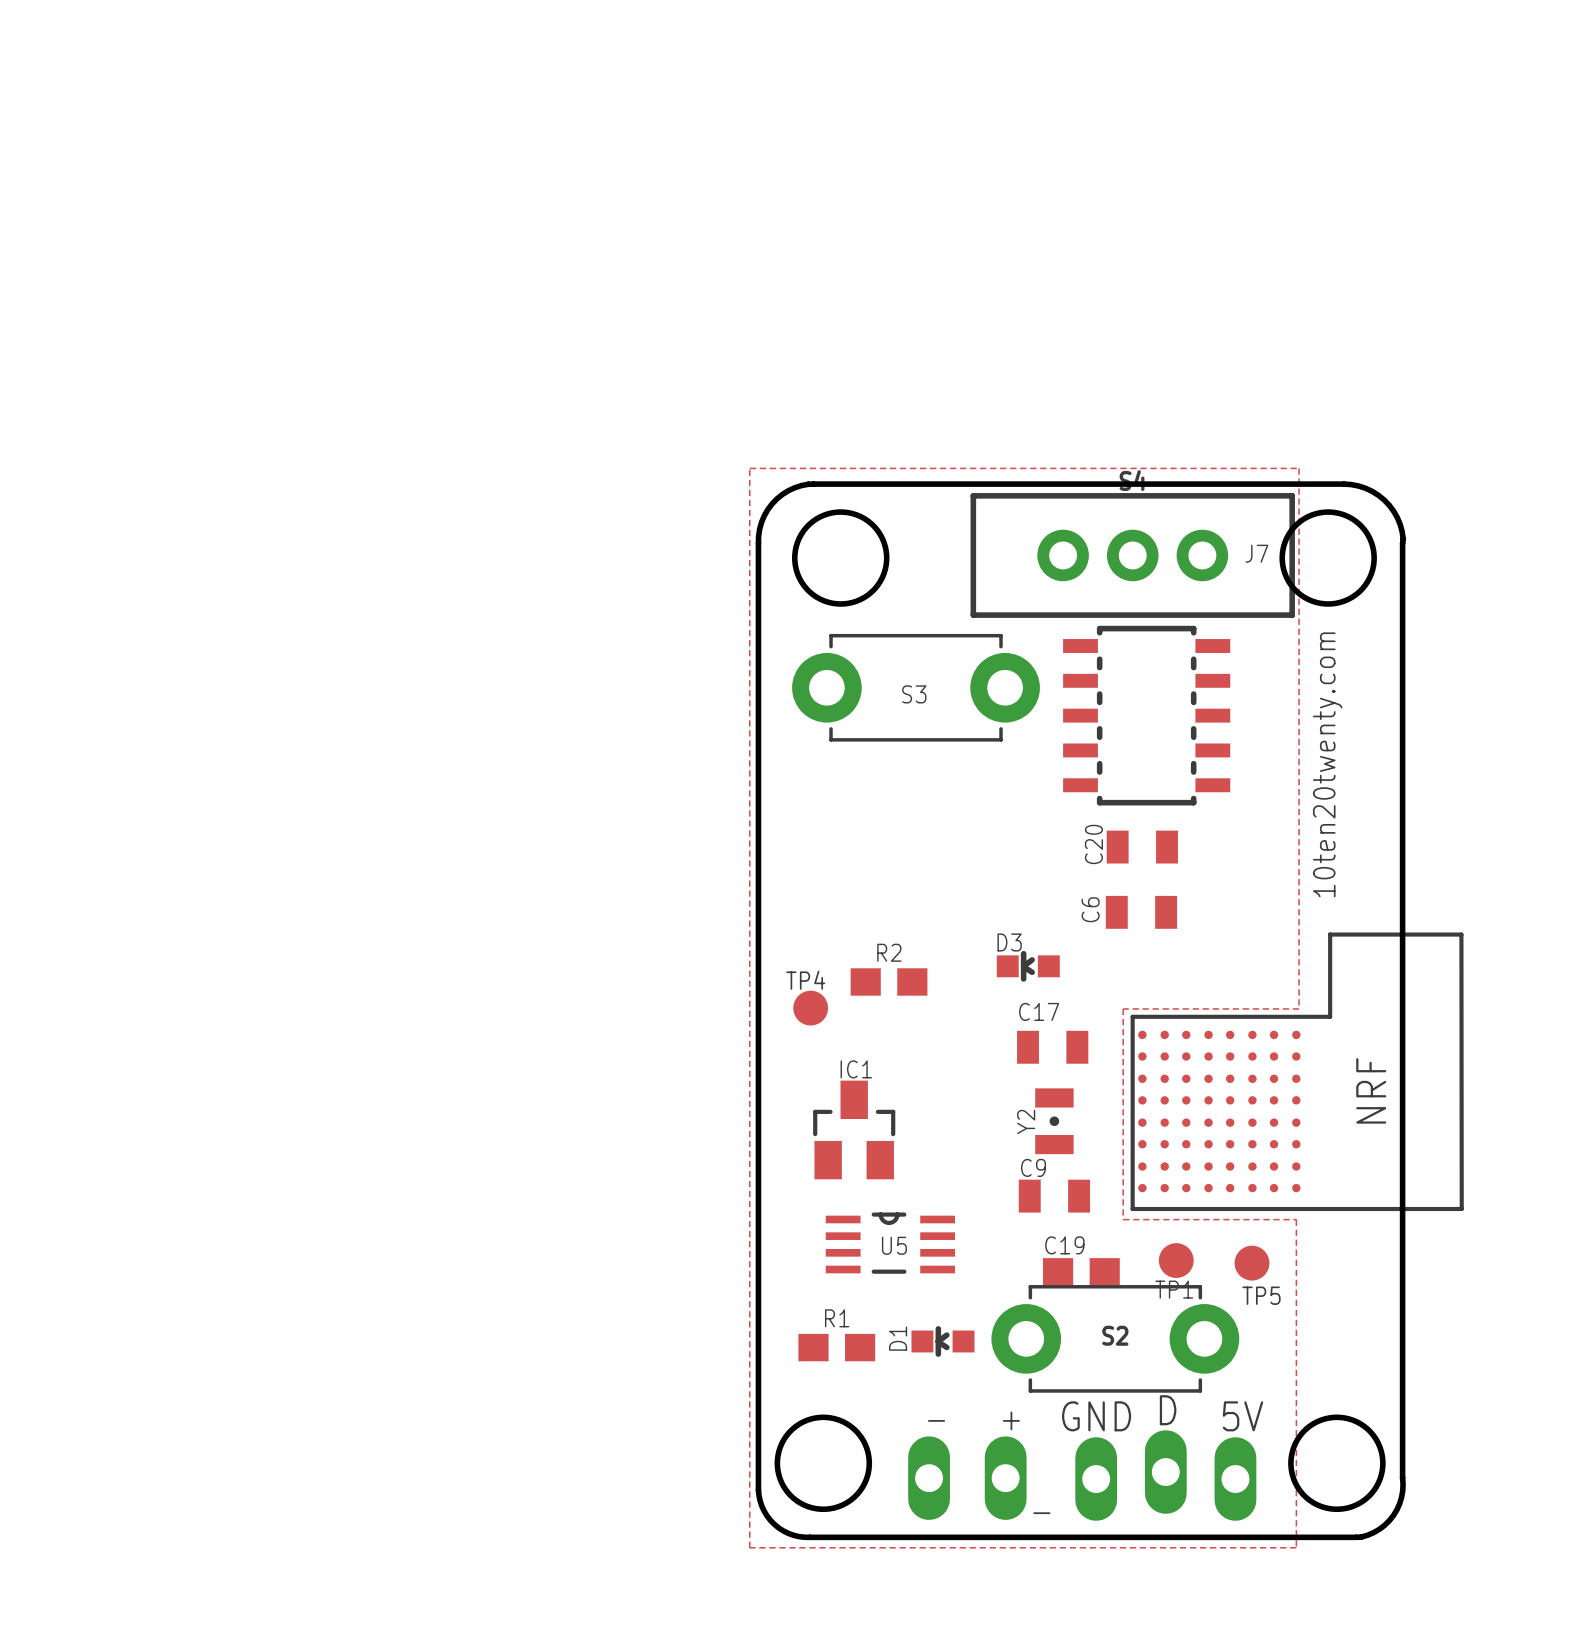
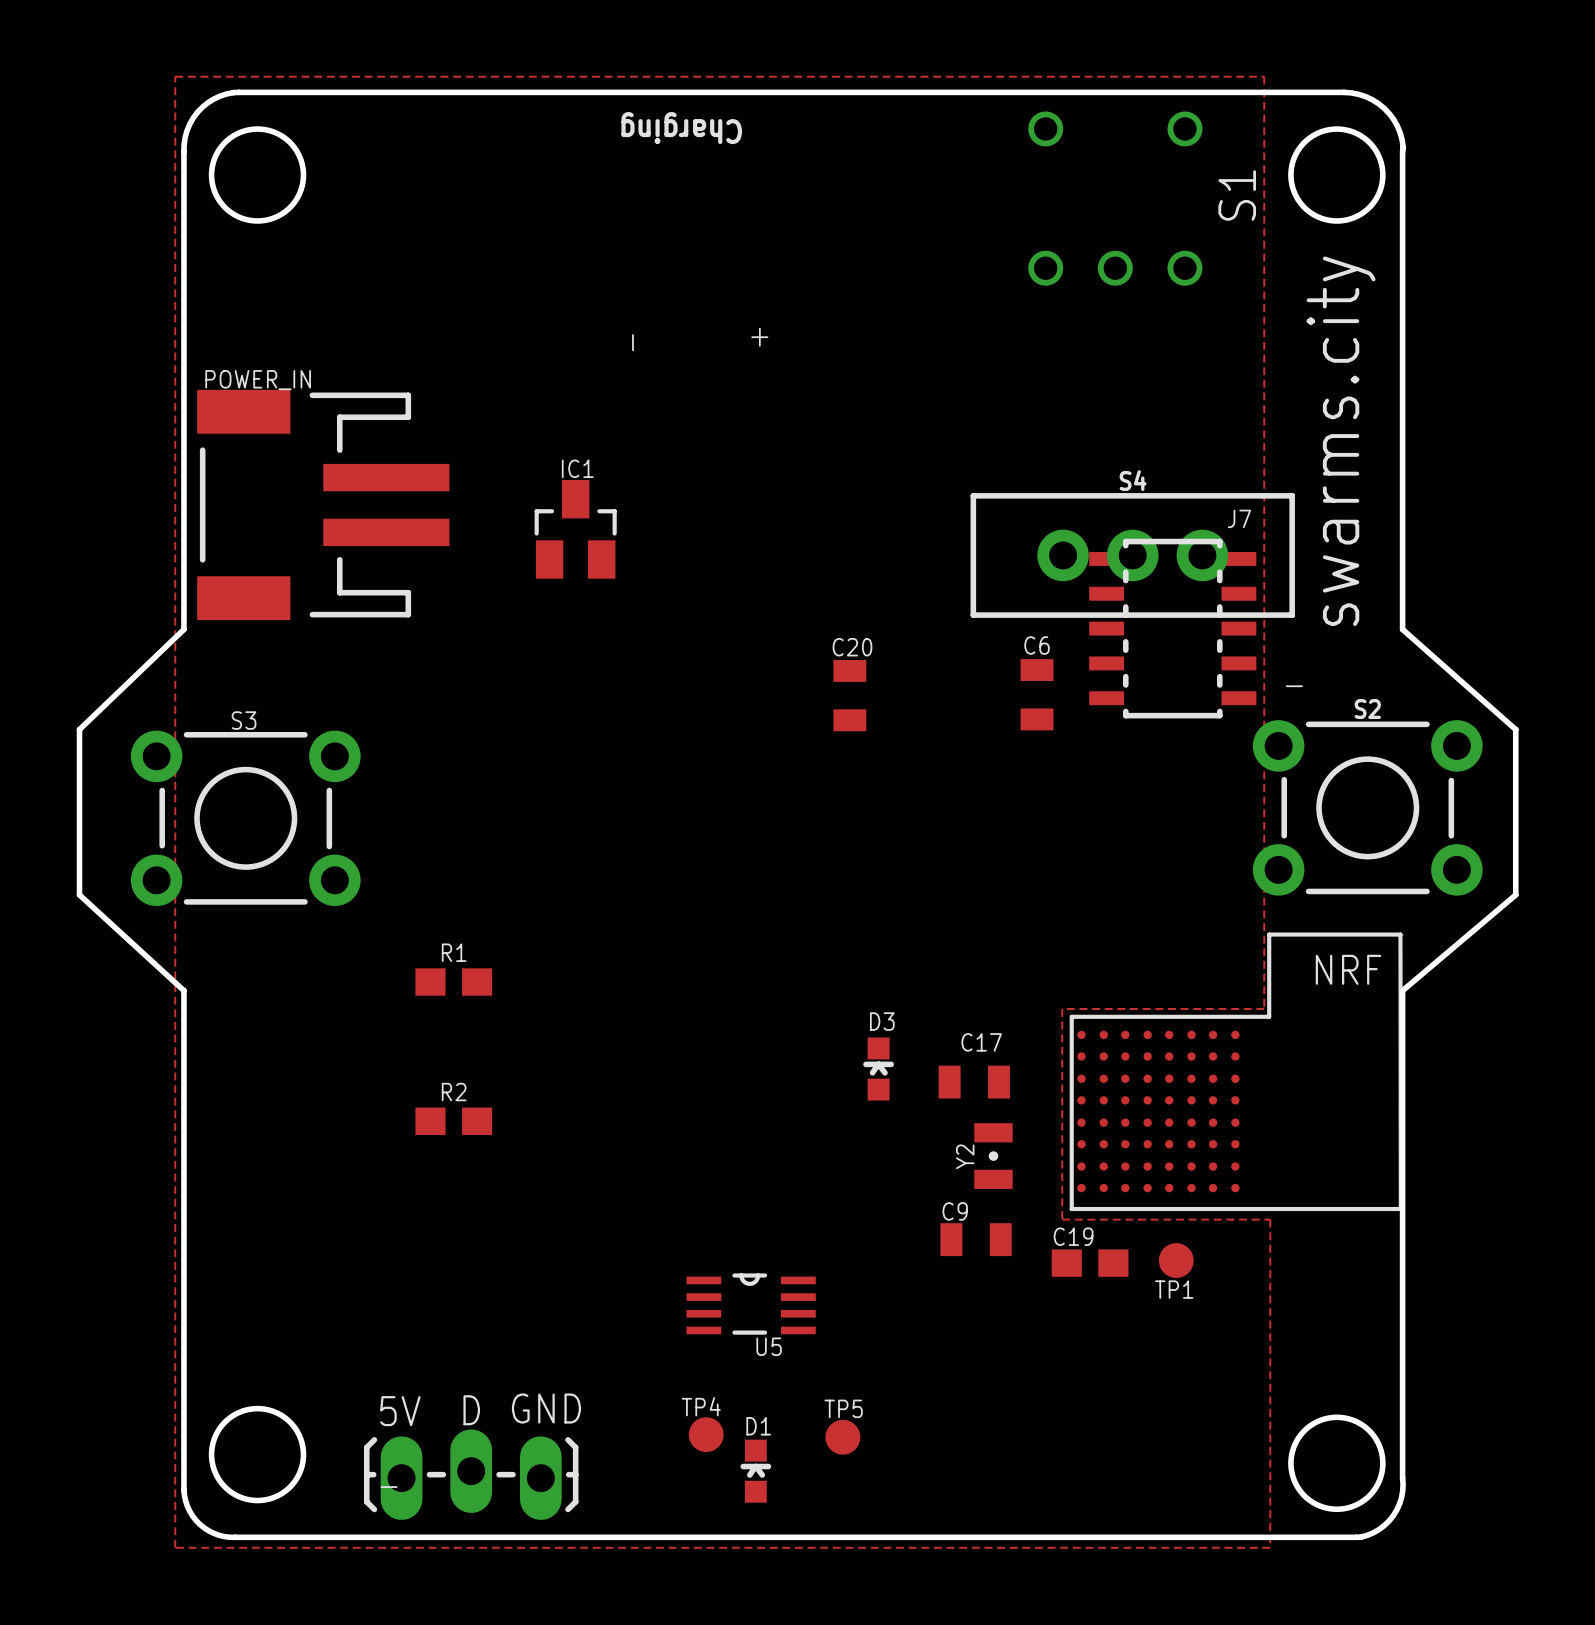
round board edge: none -> [208, 126, 307, 224]
round board edge: none -> [1288, 126, 1386, 224]
text: none -> Charging (681, 128)
S1: none -> (1115, 198)
text: none -> + (759, 337)
text: none -> - (632, 342)
text: none -> swarms.city (1341, 441)
POWER_IN: none -> (323, 504)
round board edge: [791, 509, 890, 607] -> none
round board edge: [1279, 509, 1377, 607] -> none
board edge: (1402, 543) (1402, 531) (1397, 517) (1384, 500) (1365, 488) (1344, 484) (808, 484) (788, 490) (776, 499) (767, 509) (761, 522) (758, 543) (758, 1490) (761, 1506) (774, 1524) (793, 1535) (809, 1537) -> (1402, 543) (1403, 147) (1400, 133) (1393, 119) (1384, 108) (1365, 96) (1344, 92) (239, 92) (226, 93) (213, 99) (202, 107) (193, 118) (186, 130) (183, 151) (183, 629) (79, 729) (79, 894) (183, 990) (183, 1490) (187, 1506) (196, 1520) (204, 1527) (219, 1535) (229, 1537) (809, 1537)
J7 name position: J7 (1256, 553) -> J7 (1239, 518)
board edge: (1402, 629) (1402, 990) -> (1402, 629) (1515, 729) (1515, 894) (1402, 990)
S3 footprint: [792, 633, 1040, 742] -> [130, 730, 361, 907]
text: none -> - (1294, 686)
S3 name position: S3 (914, 694) -> S3 (244, 720)
J7 position: (1146, 715) -> (1172, 628)
text: 10ten20twenty.com (1327, 764) -> none
C20 rotation: 0° (1142, 847) -> 90° clockwise (849, 695)
C20 position: (1142, 847) -> (849, 695)
C6 rotation: 0° (1141, 912) -> 90° clockwise (1037, 694)
C6 position: (1141, 912) -> (1037, 694)
D3 rotation: 0° (1028, 966) -> 90° clockwise (878, 1069)
D3 position: (1028, 966) -> (878, 1069)
R2 position: (889, 981) -> (453, 1121)
TP4 position: (810, 1008) -> (706, 1434)
zone outline: (1123, 1008) (1123, 1219) -> (1123, 1008) (1062, 1008) (1062, 1219) (1123, 1219)
zone outline: (1264, 1008) (1299, 1008) (1299, 468) (749, 468) (749, 1547) -> (1264, 1008) (1264, 76) (175, 76) (175, 1547) (749, 1547)
C17 name position: C17 (1039, 1011) -> C17 (981, 1042)
C17 position: (1052, 1047) -> (974, 1082)
part position: (1297, 1071) -> (1236, 1071)
text rotation: 0° (1371, 1090) -> 90° clockwise (1348, 969)
text position: NRF (1371, 1090) -> NRF (1348, 969)
Y2 position: (1054, 1121) -> (993, 1156)
IC1 position: (854, 1129) -> (575, 529)
C9 position: (1054, 1196) -> (976, 1239)
zone outline: (1270, 1219) (1296, 1219) (1296, 1547) (1270, 1547) -> (1270, 1219) (1270, 1547)
U5 position: (890, 1243) -> (751, 1304)
U5 name position: U5 (894, 1245) -> U5 (769, 1346)
TP5 position: (1252, 1263) -> (842, 1437)
C19 position: (1081, 1271) -> (1090, 1263)
S2 footprint: [991, 1285, 1240, 1393] -> [1252, 720, 1483, 896]
TP5 name position: TP5 (1261, 1295) -> TP5 (843, 1408)
S2 name position: S2 (1115, 1335) -> S2 (1367, 709)
D1 rotation: 0° (942, 1341) -> 90° clockwise (755, 1471)
D1 position: (942, 1341) -> (755, 1471)
R1 position: (836, 1347) -> (453, 981)
round board edge: none -> [208, 1405, 307, 1504]
text: none -> D (471, 1410)
text: D (1168, 1410) -> none
text: none -> 5V (400, 1411)
round board edge: [774, 1414, 873, 1513] -> none
text position: GND (1096, 1416) -> GND (546, 1408)
text: 5V (1242, 1416) -> none
text: - (936, 1420) -> none
text: + (1011, 1420) -> none
part: none -> (471, 1474)
part: (1165, 1475) -> none
part: (967, 1478) -> none
text: none -> - (389, 1487)
text: - (1041, 1513) -> none

